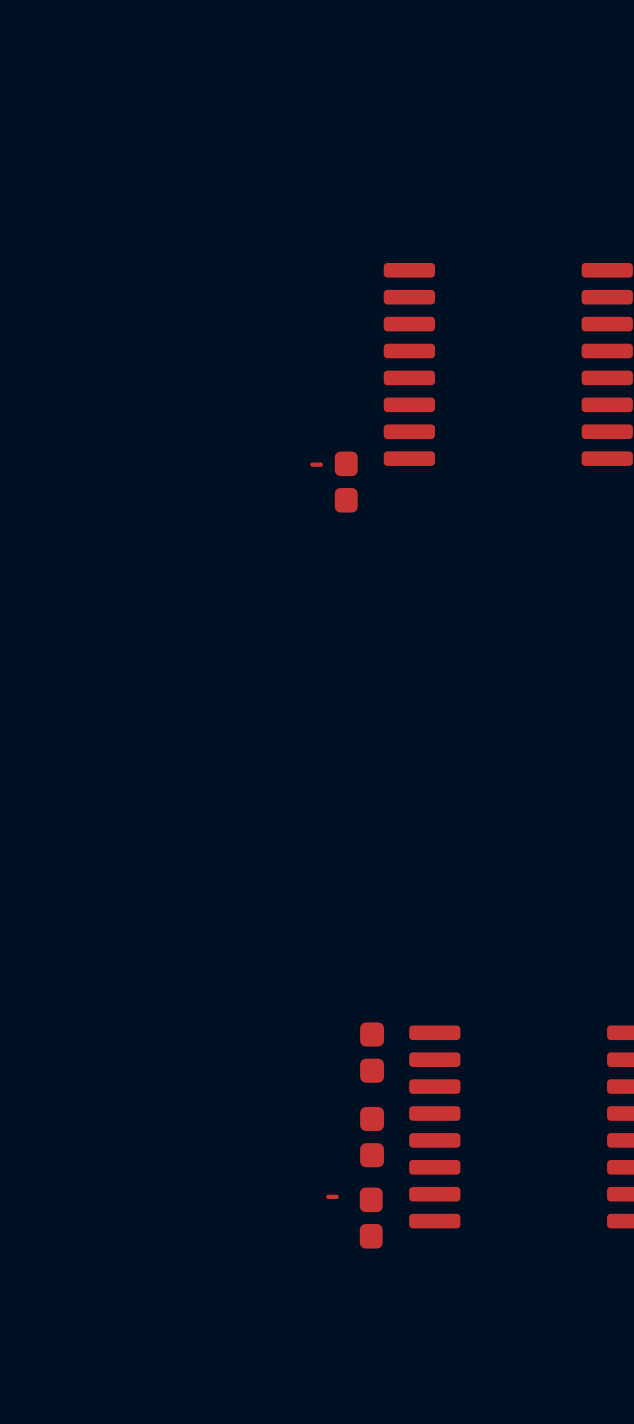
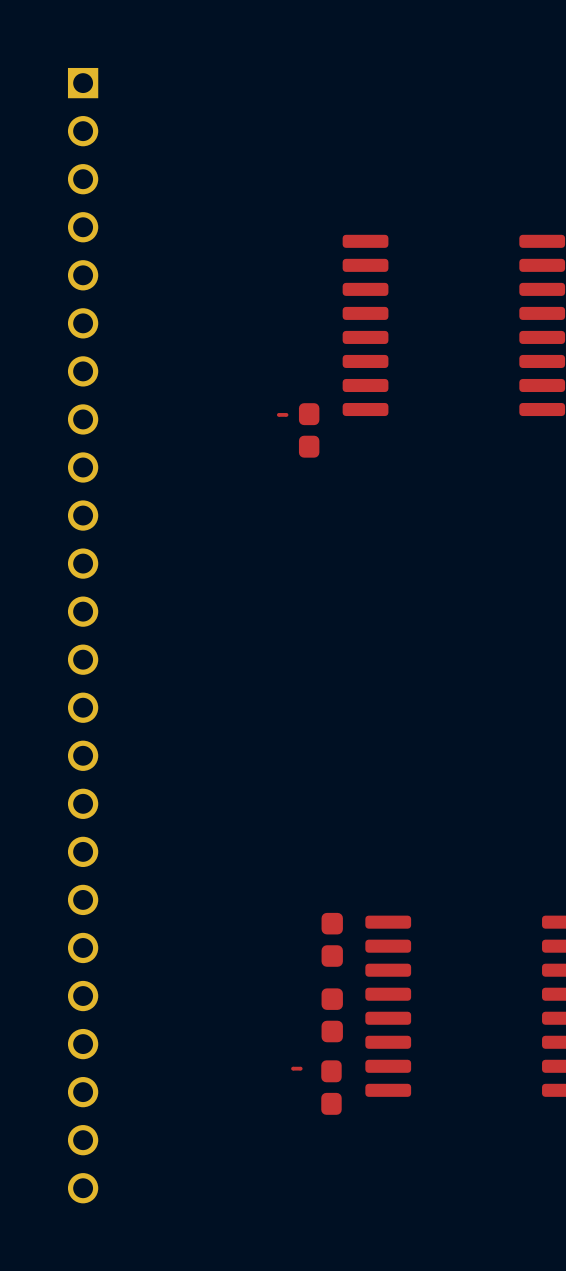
part: none -> (83, 635)

